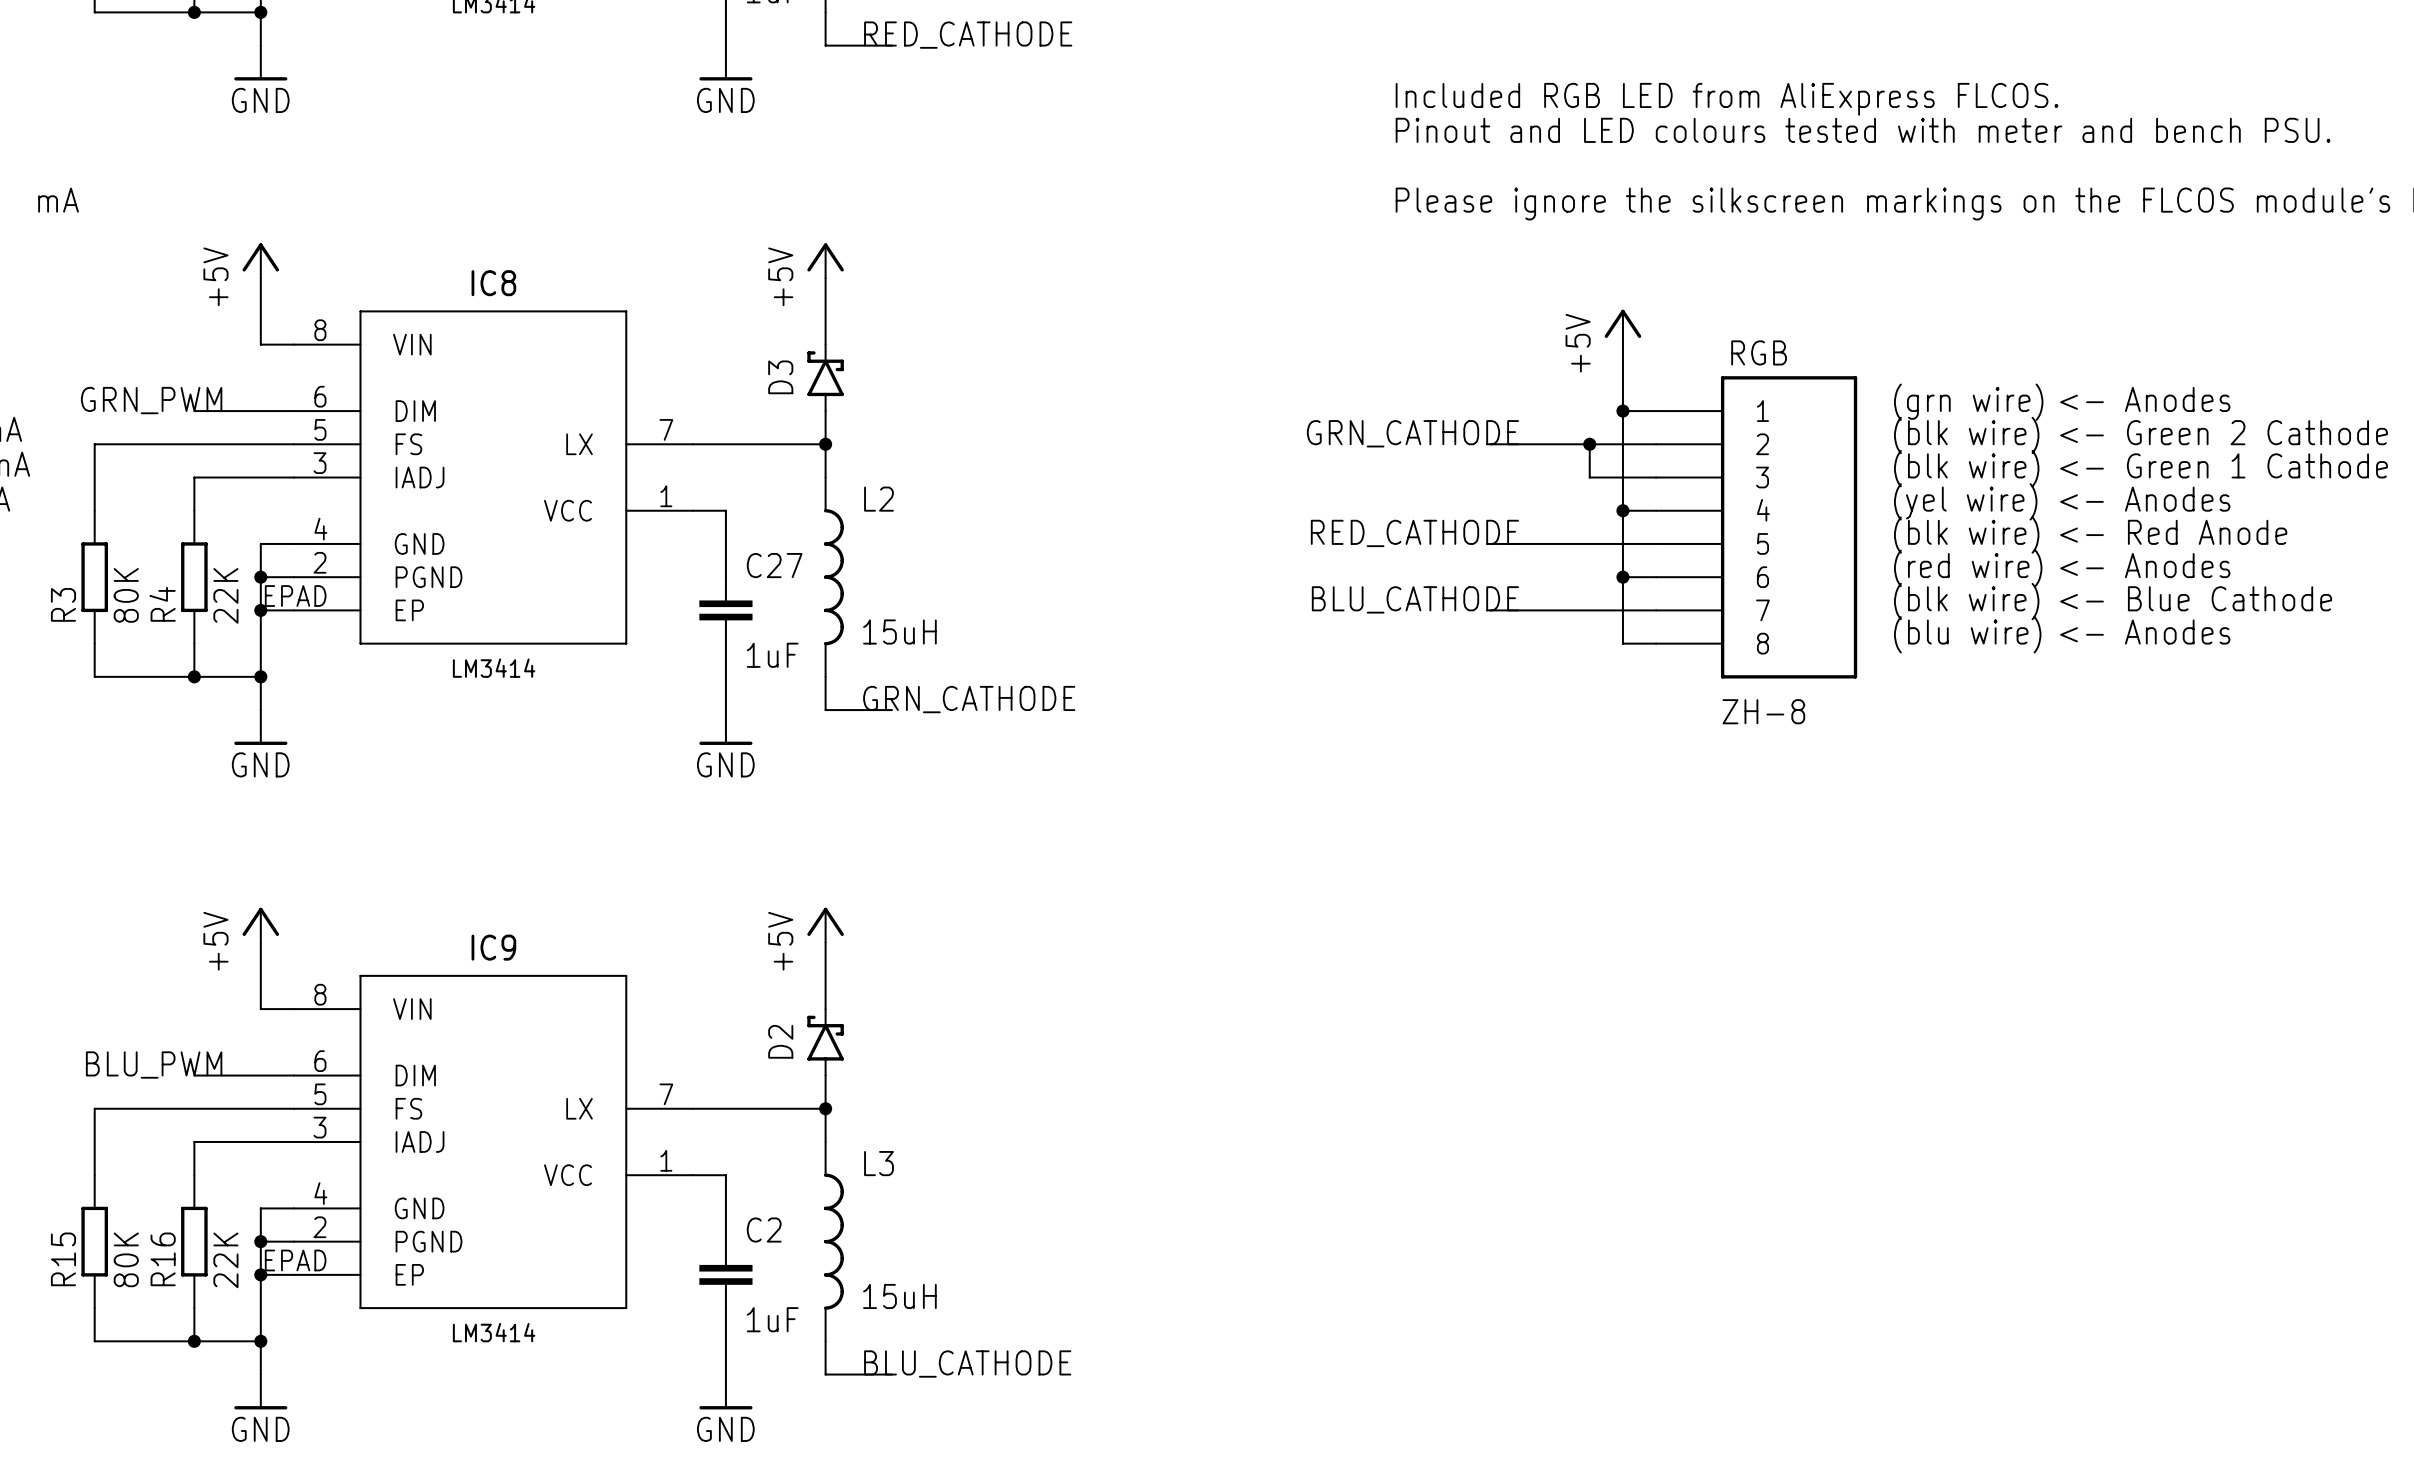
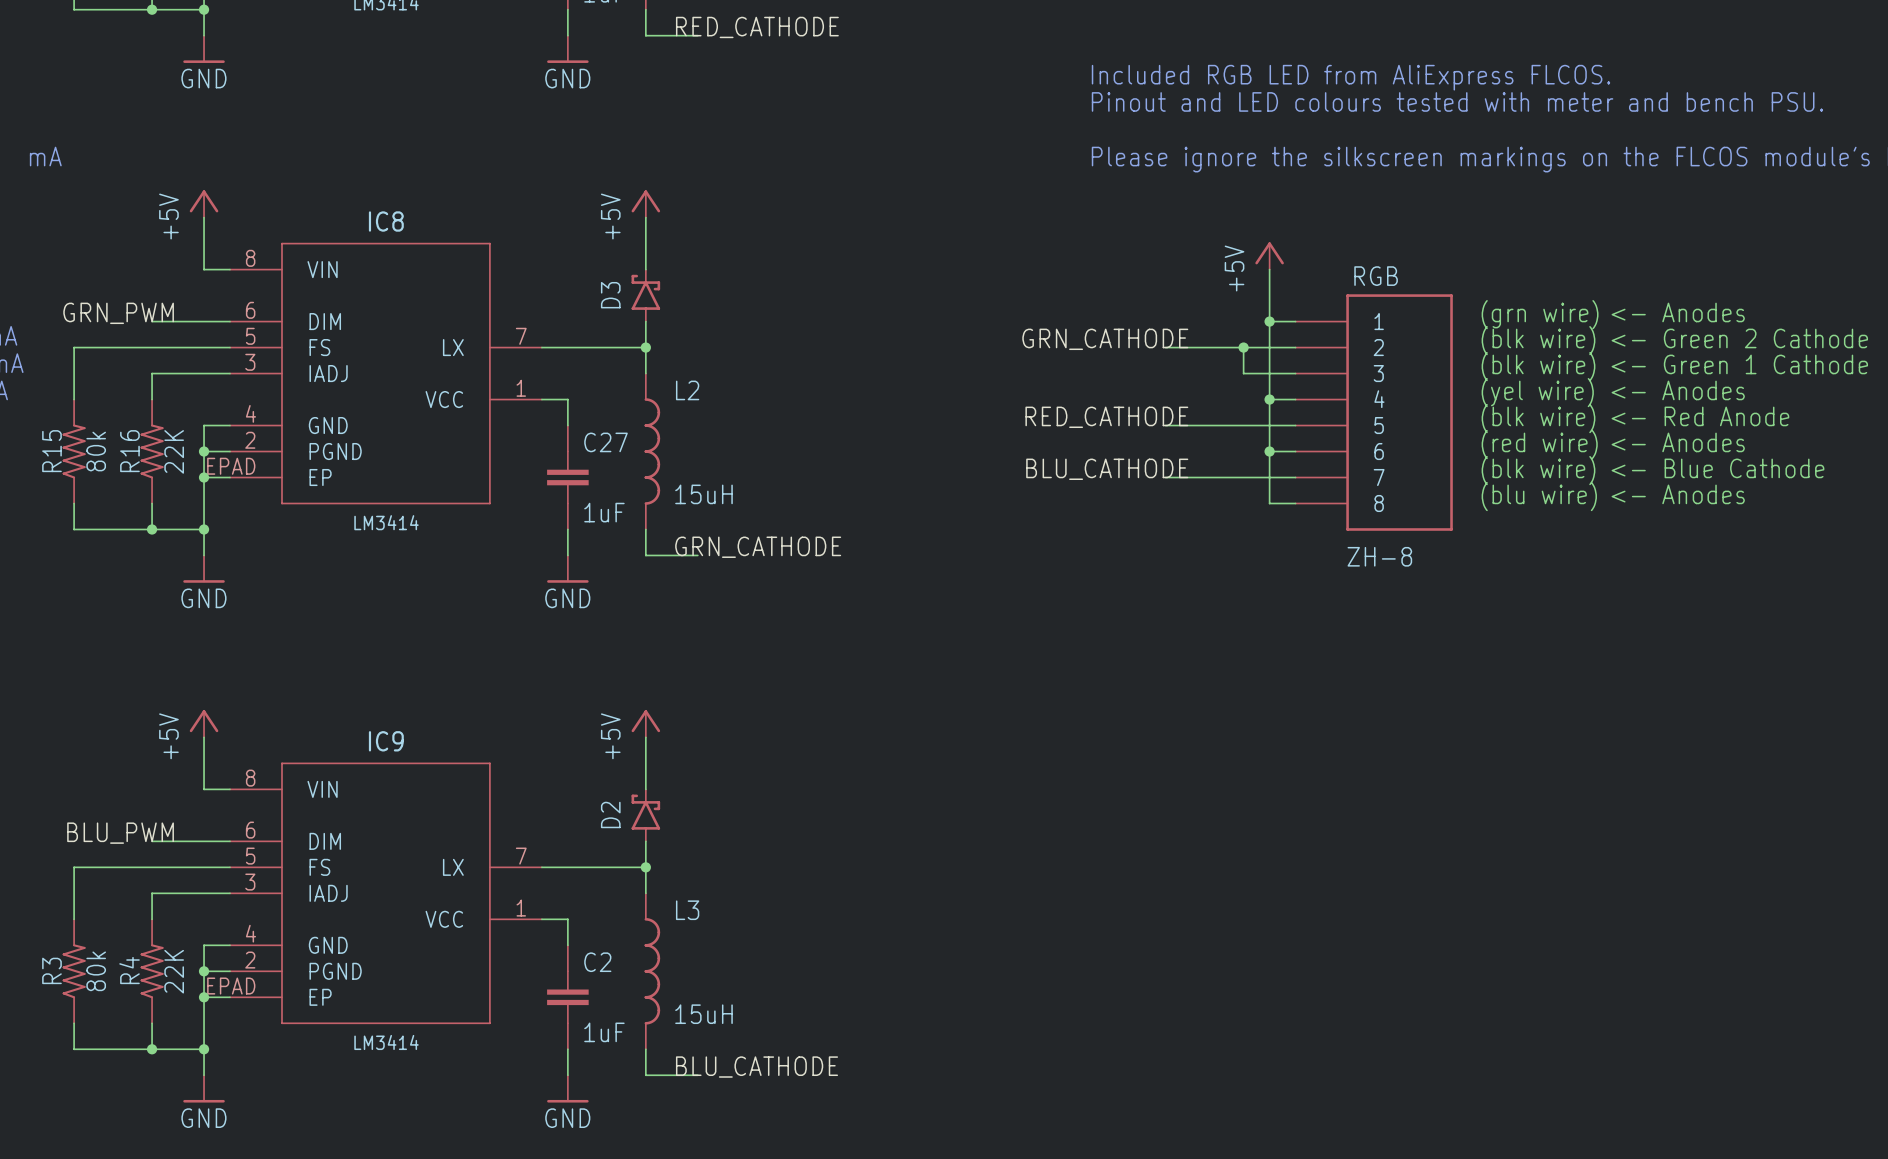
R3 symbol: [81, 510, 108, 644] -> [62, 919, 86, 1024]
R4 symbol: [181, 510, 208, 644] -> [140, 919, 164, 1024]
R3 value: 80K (126, 595) -> 80k (96, 971)
R15 symbol: [81, 1175, 108, 1309] -> [62, 399, 86, 504]
R16 symbol: [181, 1175, 208, 1309] -> [140, 399, 164, 504]
R15 value: 80K (126, 1259) -> 80k (96, 451)

